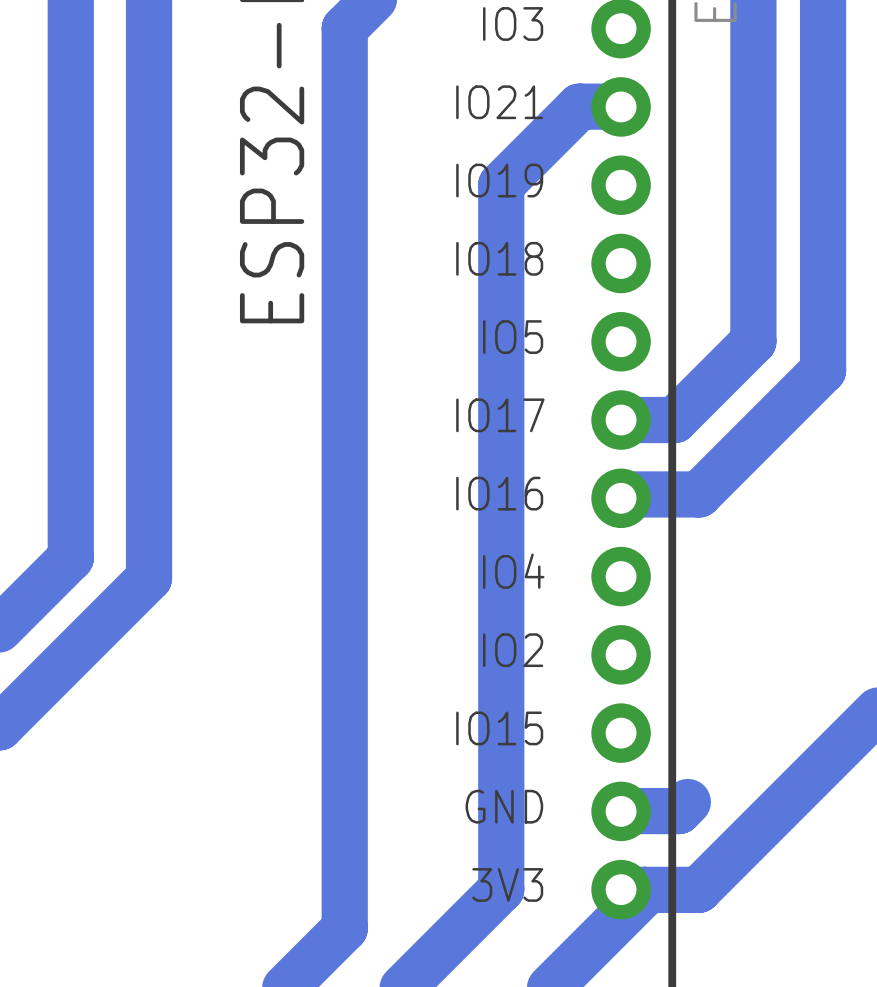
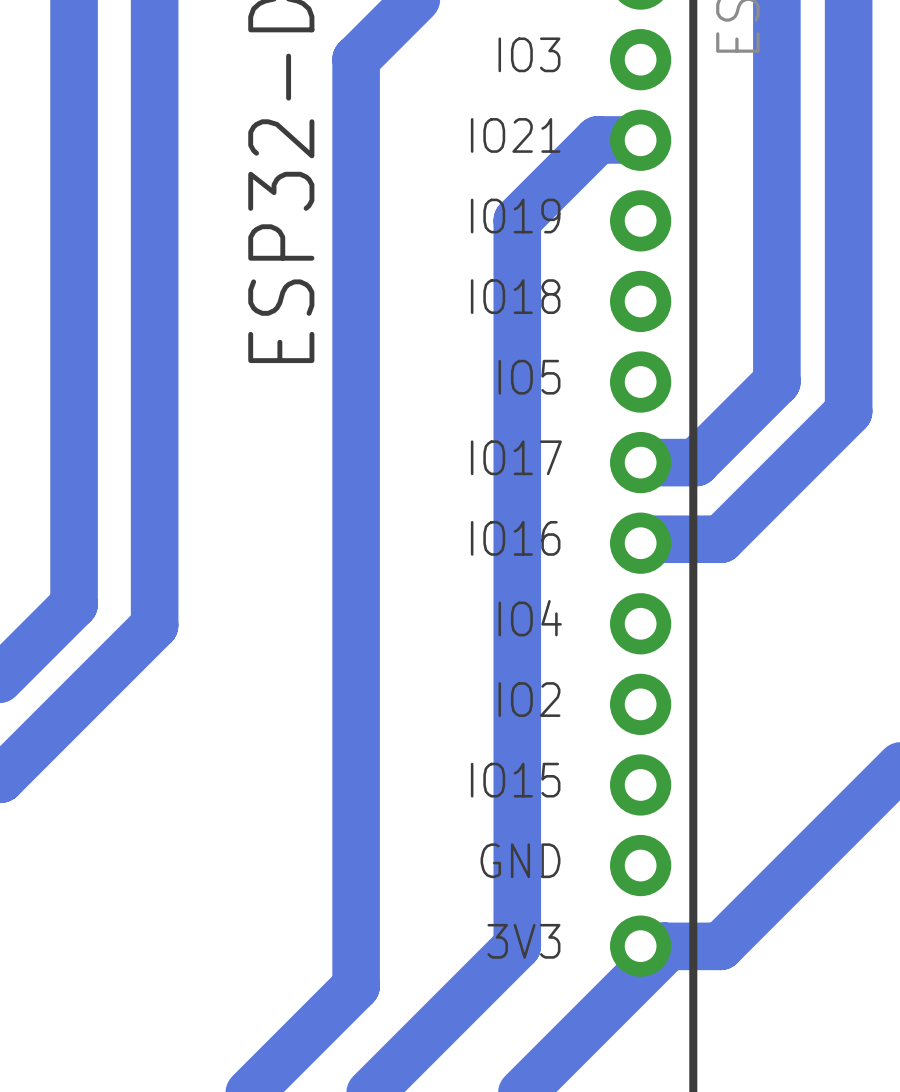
bottom track: (687, 802) (678, 811) (621, 811) -> none

